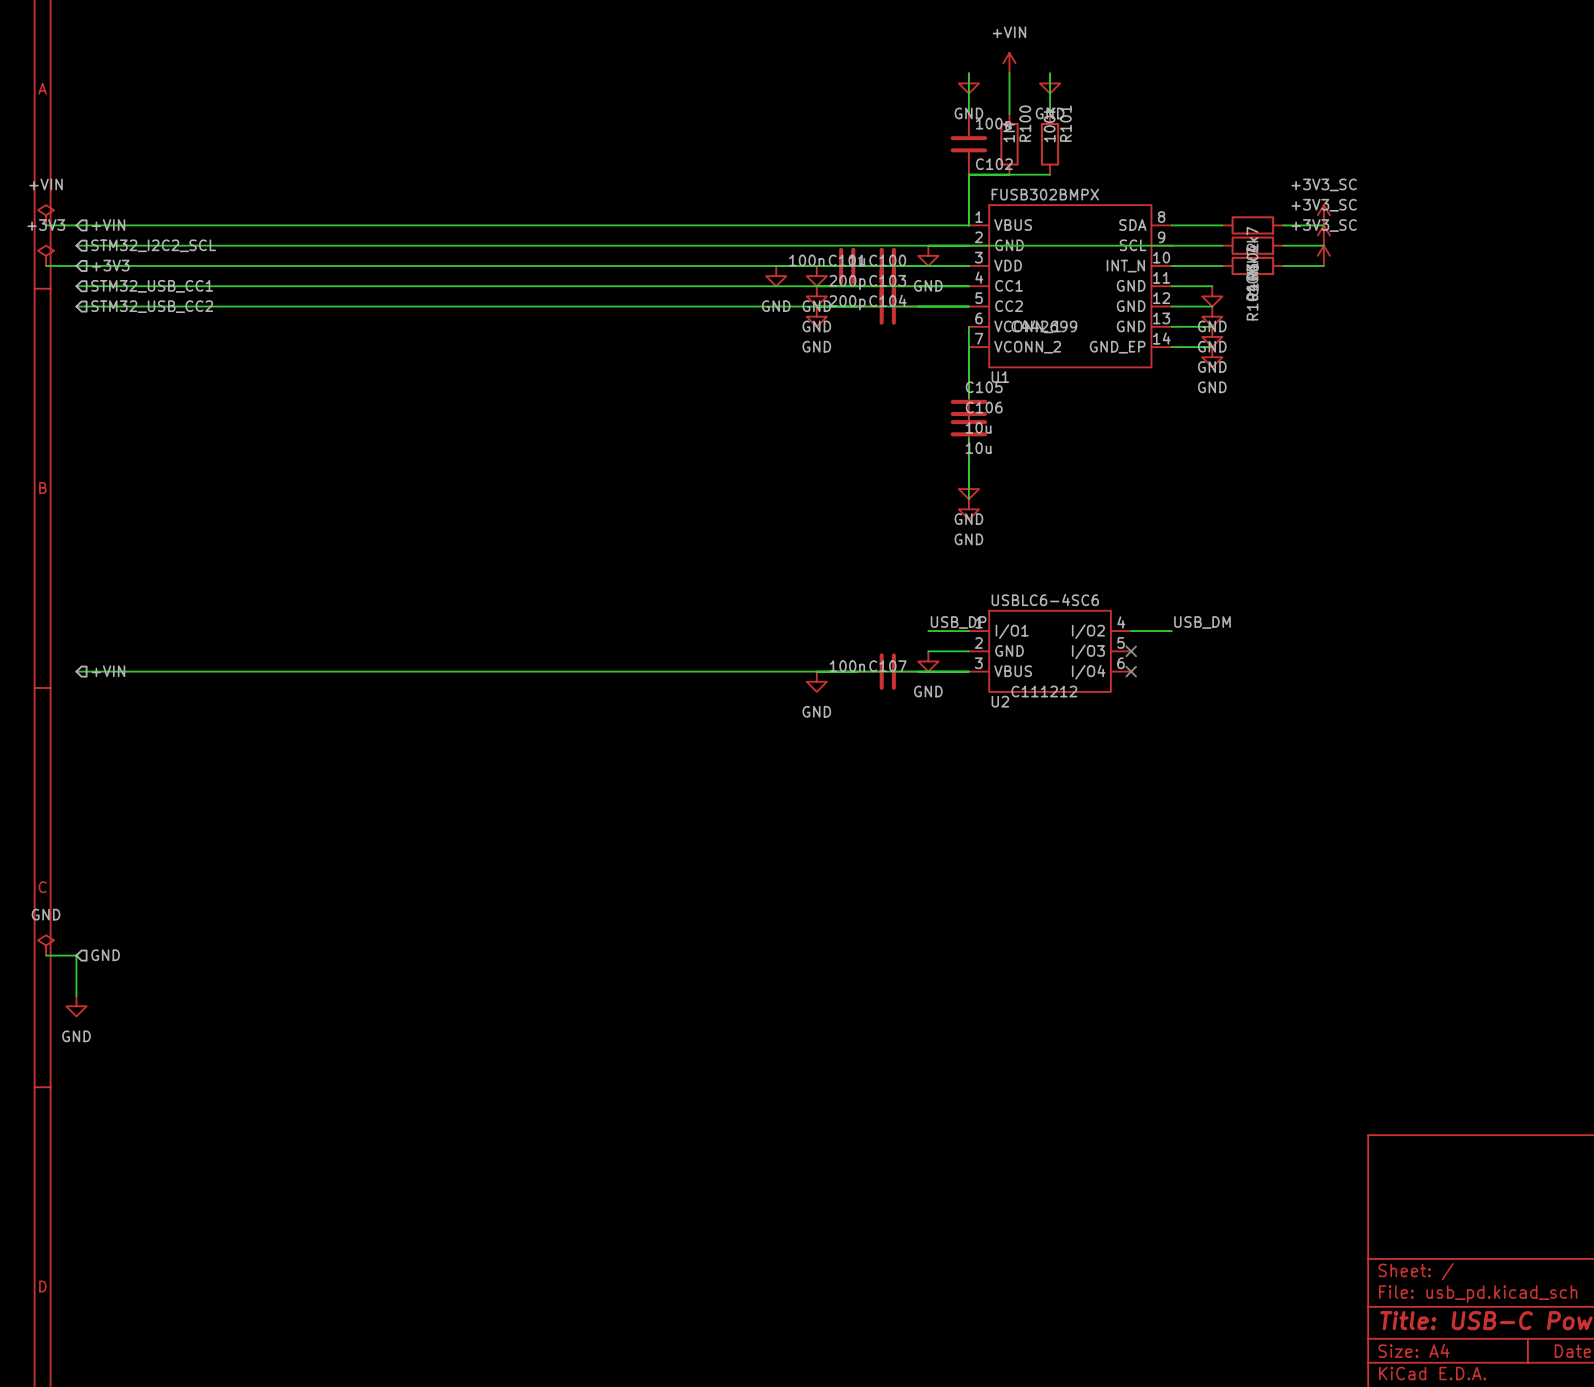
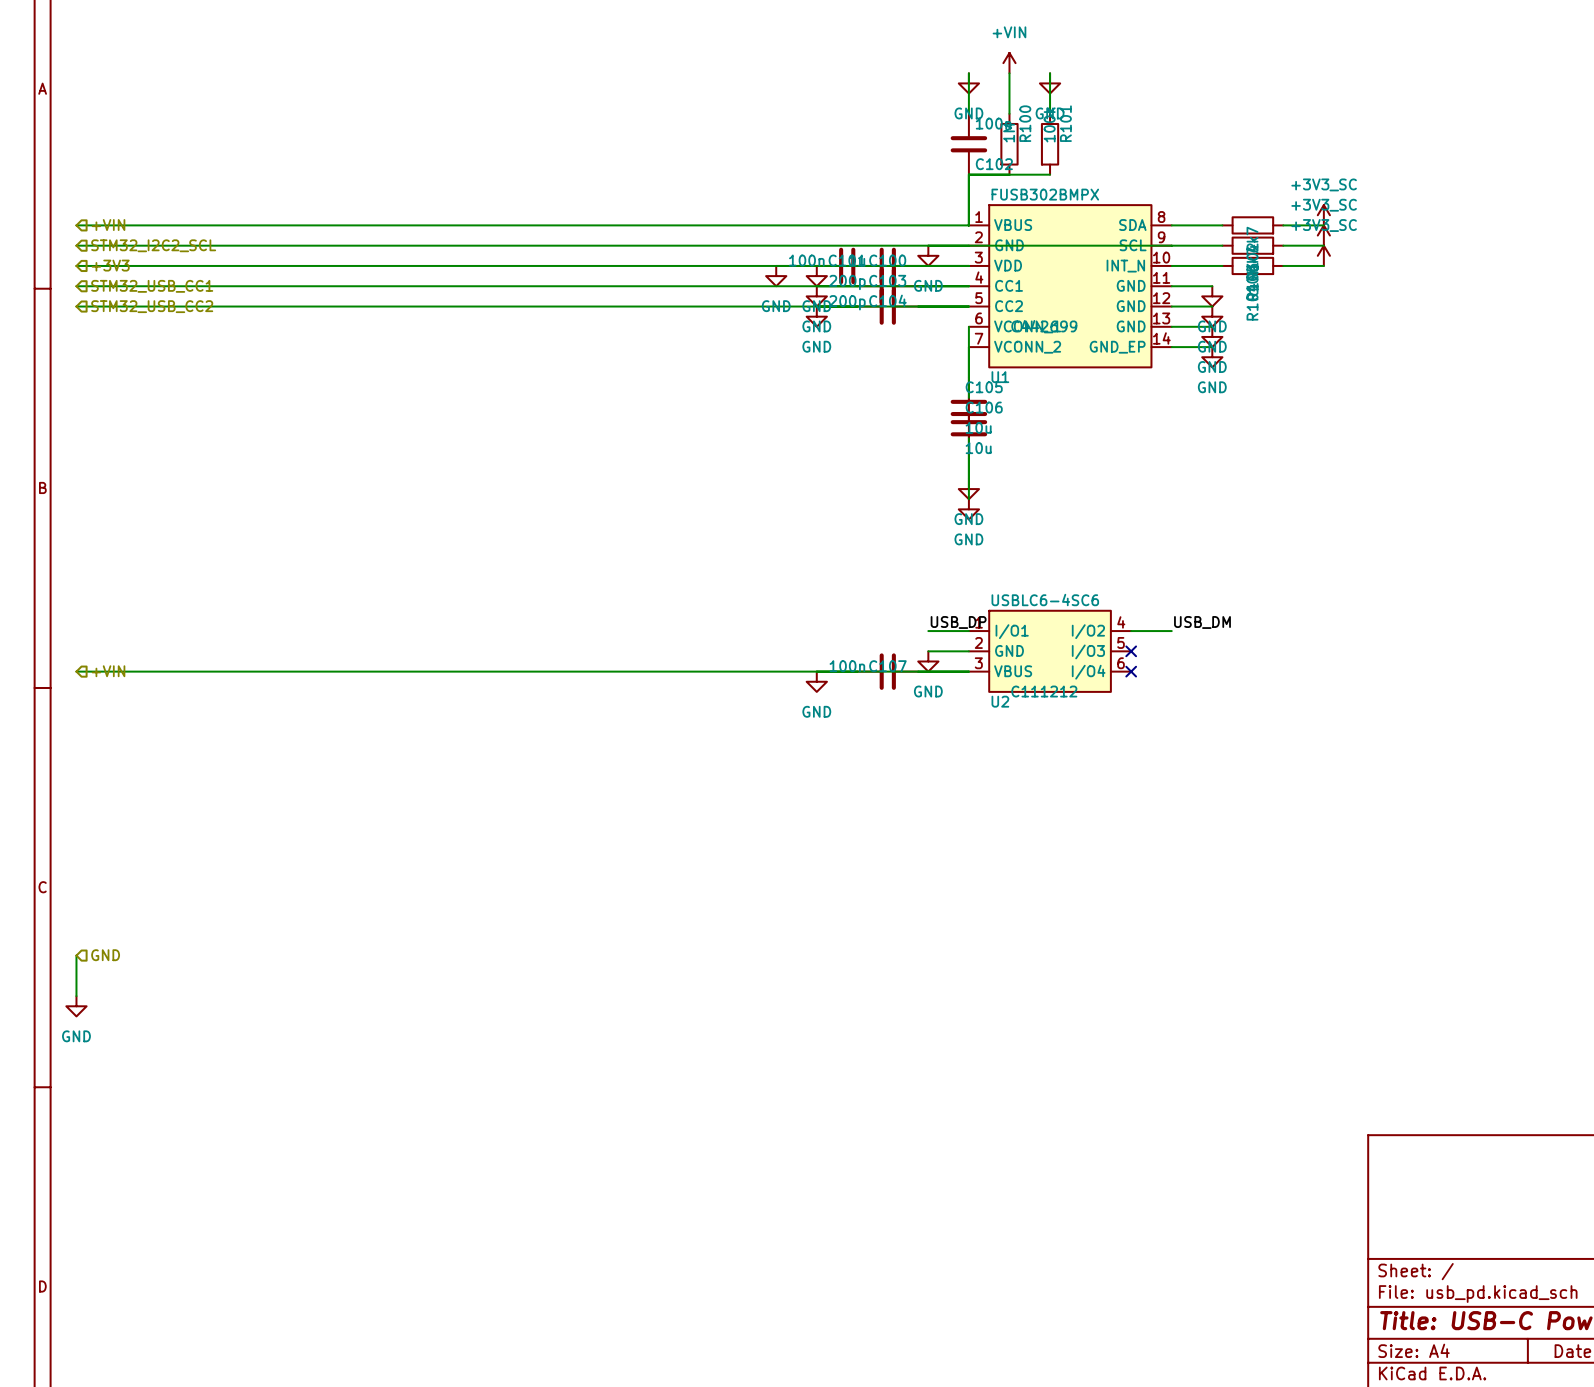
power symbol: +VIN (46, 215) -> none
wire: (46, 225) (76, 225) -> none
power symbol: +3V3 (46, 255) -> none
wire: (46, 265) (76, 265) -> none
power symbol: GND (46, 945) -> none
wire: (46, 955) (76, 955) -> none

